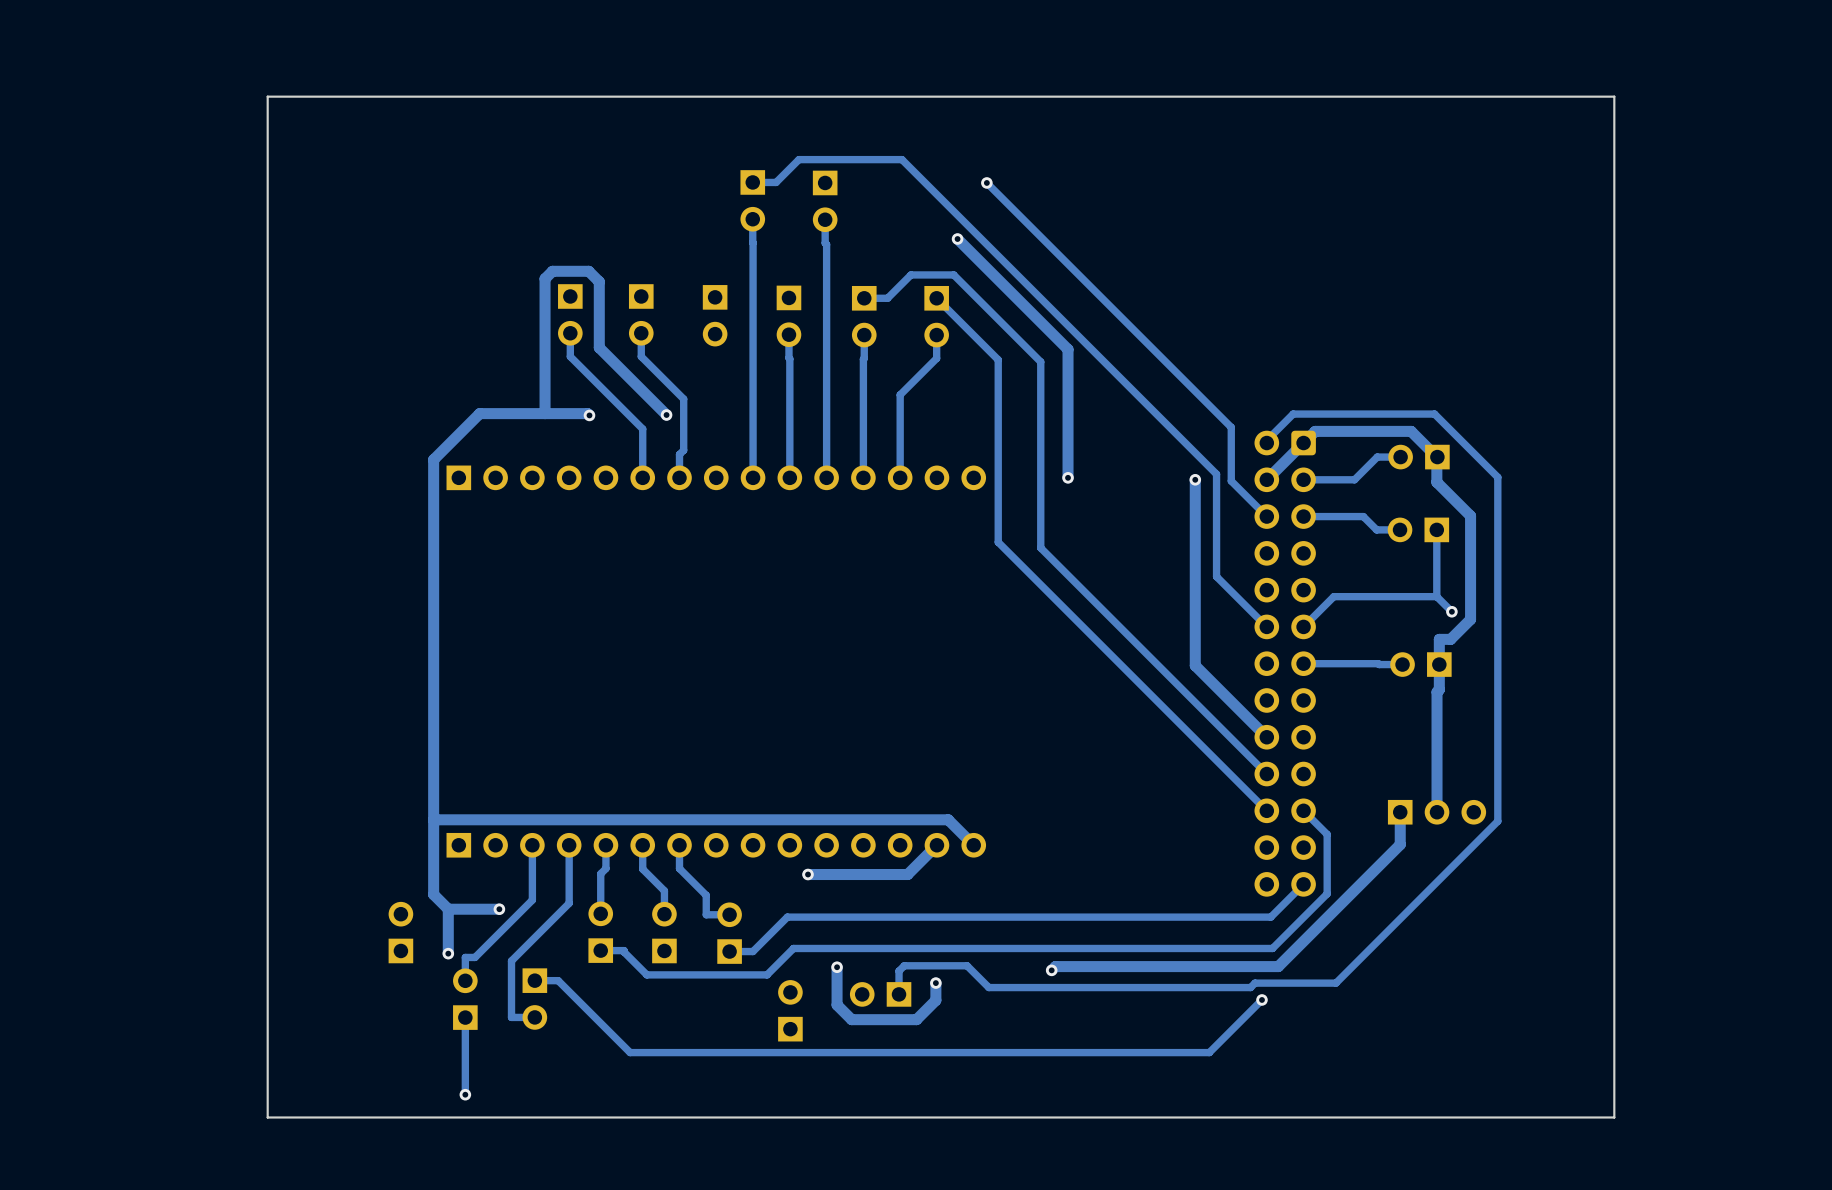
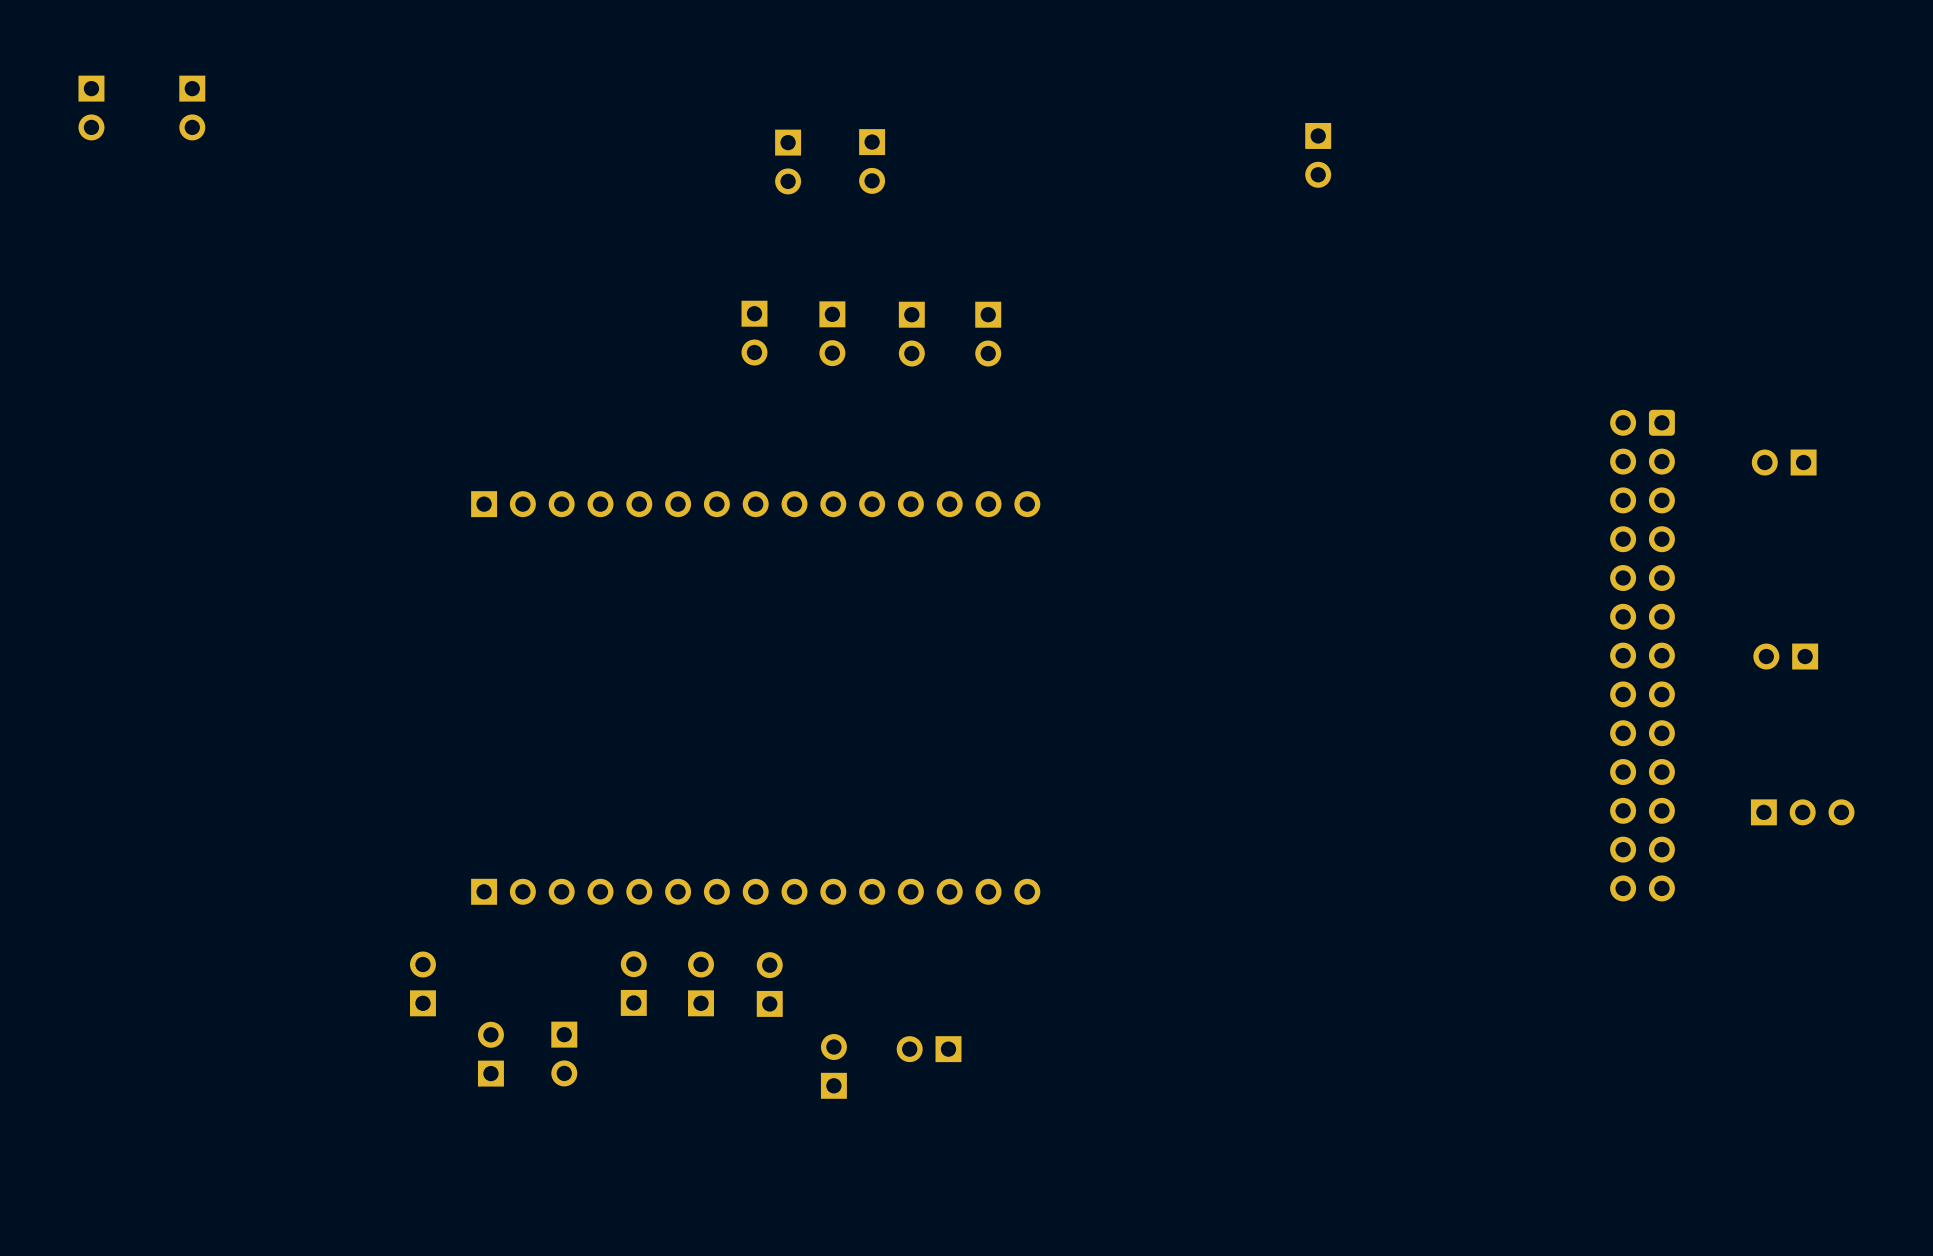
board edge: (1614, 96) (1614, 1117) (267, 1117) (267, 96) (1614, 96) -> none
part: none -> (91, 108)
part: none -> (192, 108)
part: none -> (1318, 155)
part: none -> (788, 162)
part: none -> (872, 161)
track: (752, 182) (776, 182) (798, 159) (901, 159) (1216, 474) (1216, 576) (1266, 626) -> none
track: (986, 182) (1231, 427) (1231, 481) (1266, 516) -> none
via: (986, 182) -> none
part: (752, 200) -> none
part: (825, 201) -> none
track: (752, 219) (753, 477) -> none
track: (825, 219) (826, 477) -> none
track: (957, 239) (1068, 349) (1068, 477) -> none
via: (957, 239) -> none
track: (864, 298) (887, 298) (910, 274) (953, 274) (1040, 361) (1040, 547) (1266, 774) -> none
track: (936, 298) (998, 359) (998, 542) (1266, 810) -> none
part: (570, 314) -> none
part: (641, 314) -> none
track: (570, 333) (570, 356) (642, 429) (642, 477) -> none
track: (641, 333) (641, 356) (683, 399) (683, 450) (679, 454) (679, 477) -> none
track: (788, 334) (789, 477) -> none
track: (864, 335) (863, 477) -> none
track: (936, 335) (936, 358) (900, 394) (900, 477) -> none
track: (545, 413) (545, 278) (552, 271) (588, 271) (599, 281) (599, 347) (666, 415) -> none
track: (589, 415) (587, 413) (479, 413) (433, 459) (433, 894) (448, 909) -> none
via: (589, 415) -> none
via: (666, 415) -> none
part: none -> (1784, 462)
track: (1266, 443) (1266, 440) (1293, 414) (1434, 414) (1497, 477) (1497, 821) (1335, 983) (1255, 983) (1250, 987) (988, 987) (967, 965) (904, 965) (899, 971) (899, 994) -> none
track: (1400, 457) (1377, 457) (1354, 479) (1303, 479) -> none
part: (1419, 457) -> none
track: (1436, 457) (1436, 482) (1470, 515) (1470, 619) (1450, 639) (1439, 639) (1439, 689) (1437, 692) (1437, 812) -> none
track: (1436, 457) (1411, 431) (1315, 431) (1266, 479) -> none
via: (1068, 477) -> none
track: (1195, 479) (1195, 665) (1266, 737) -> none
via: (1195, 479) -> none
track: (1303, 516) (1363, 516) (1376, 529) (1400, 529) -> none
part: (1418, 529) -> none
track: (1436, 529) (1436, 596) -> none
track: (1436, 596) (1333, 596) (1303, 626) -> none
track: (1436, 596) (1451, 611) -> none
via: (1451, 611) -> none
part: none -> (1785, 656)
part position: (1285, 663) -> (1642, 655)
track: (1303, 663) (1402, 664) -> none
part: (1420, 664) -> none
track: (1303, 810) (1327, 834) (1327, 893) (1272, 948) (793, 948) (767, 974) (646, 974) (624, 950) (600, 950) -> none
track: (1400, 812) (1400, 844) (1278, 966) (1055, 966) (1051, 970) -> none
part position: (1437, 812) -> (1802, 812)
track: (433, 819) (948, 819) (973, 845) -> none
track: (532, 845) (532, 900) (475, 957) (465, 957) (465, 980) -> none
track: (569, 845) (569, 903) (511, 960) (511, 1017) (534, 1017) -> none
track: (605, 845) (605, 868) (600, 873) (600, 913) -> none
track: (642, 845) (642, 869) (664, 890) (664, 914) -> none
track: (679, 845) (679, 868) (706, 895) (706, 914) (729, 914) -> none
track: (936, 845) (907, 874) (808, 874) -> none
via: (808, 874) -> none
track: (1303, 884) (1270, 917) (787, 917) (752, 951) (729, 951) -> none
track: (448, 909) (448, 953) -> none
track: (499, 909) (448, 909) -> none
via: (499, 909) -> none
via: (448, 953) -> none
track: (837, 967) (837, 1005) (851, 1019) (916, 1019) (935, 1000) (935, 983) -> none
via: (837, 967) -> none
via: (1051, 970) -> none
track: (534, 980) (558, 980) (630, 1052) (1209, 1052) (1261, 999) -> none
via: (935, 983) -> none
via: (1261, 999) -> none
track: (465, 1017) (465, 1094) -> none
via: (465, 1094) -> none

